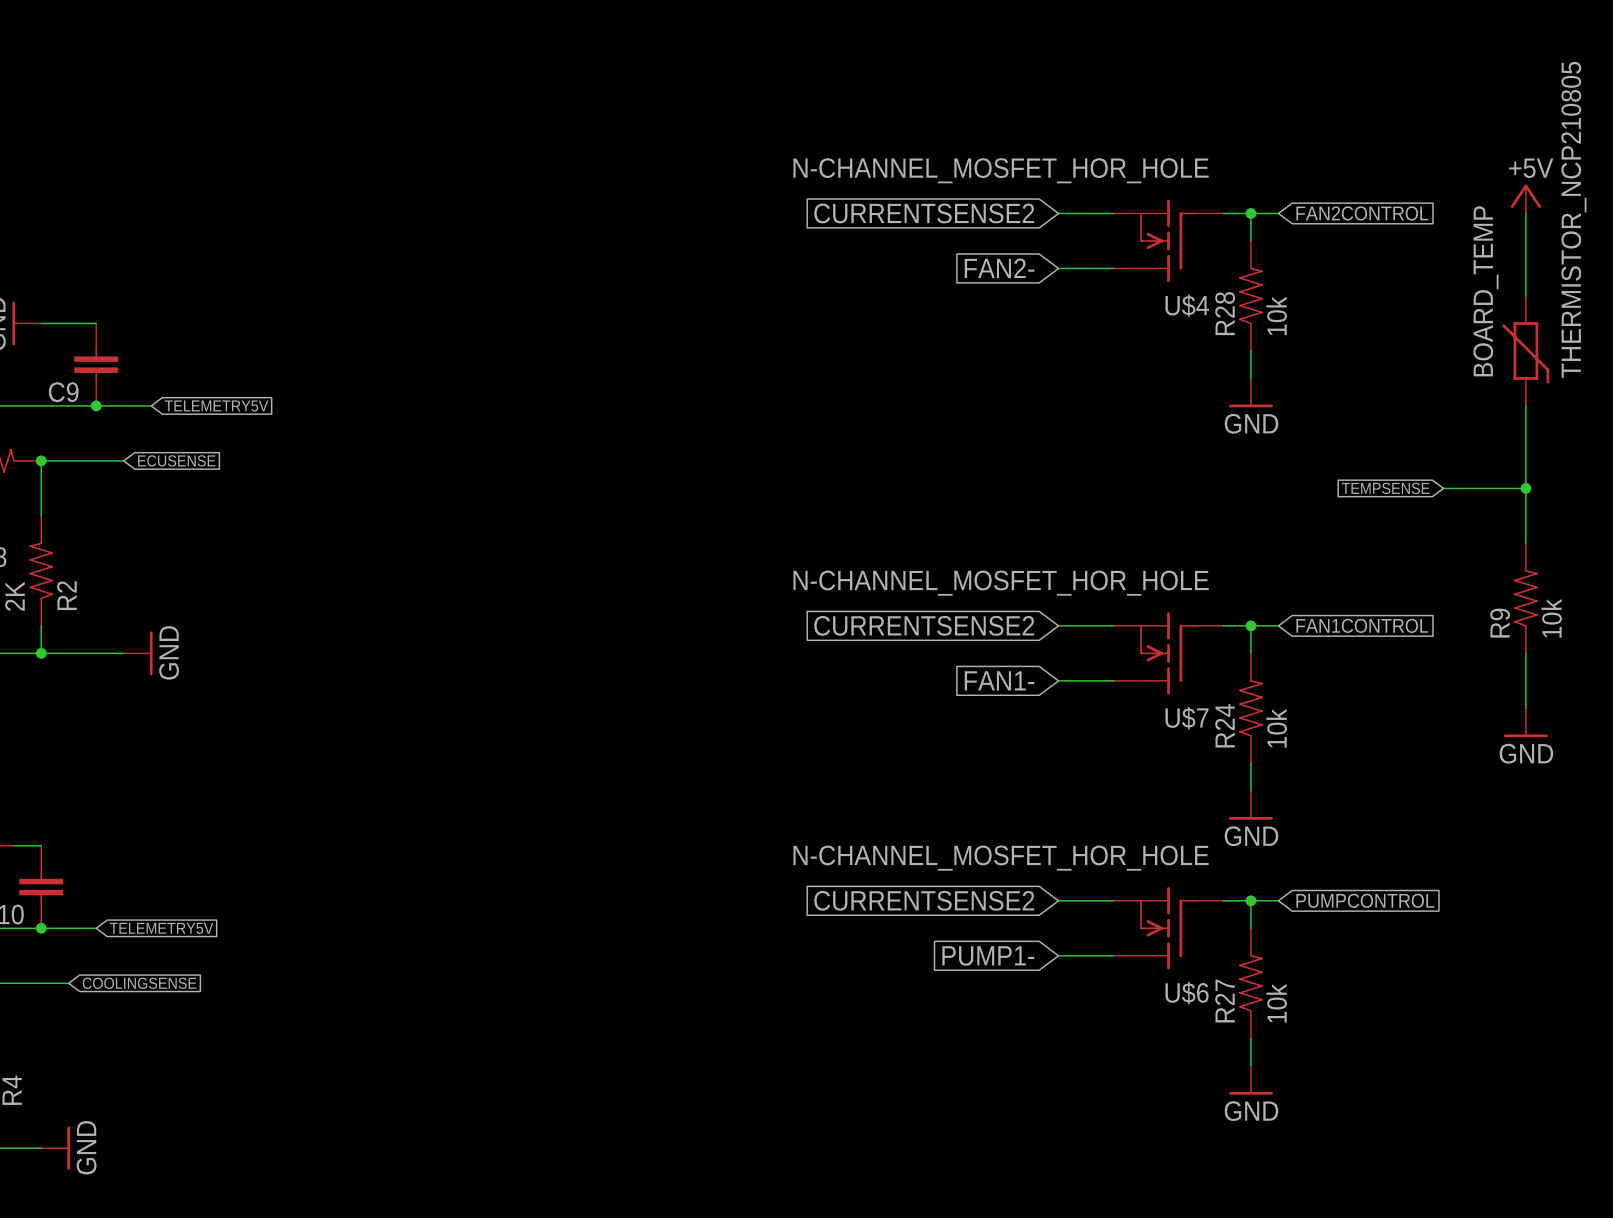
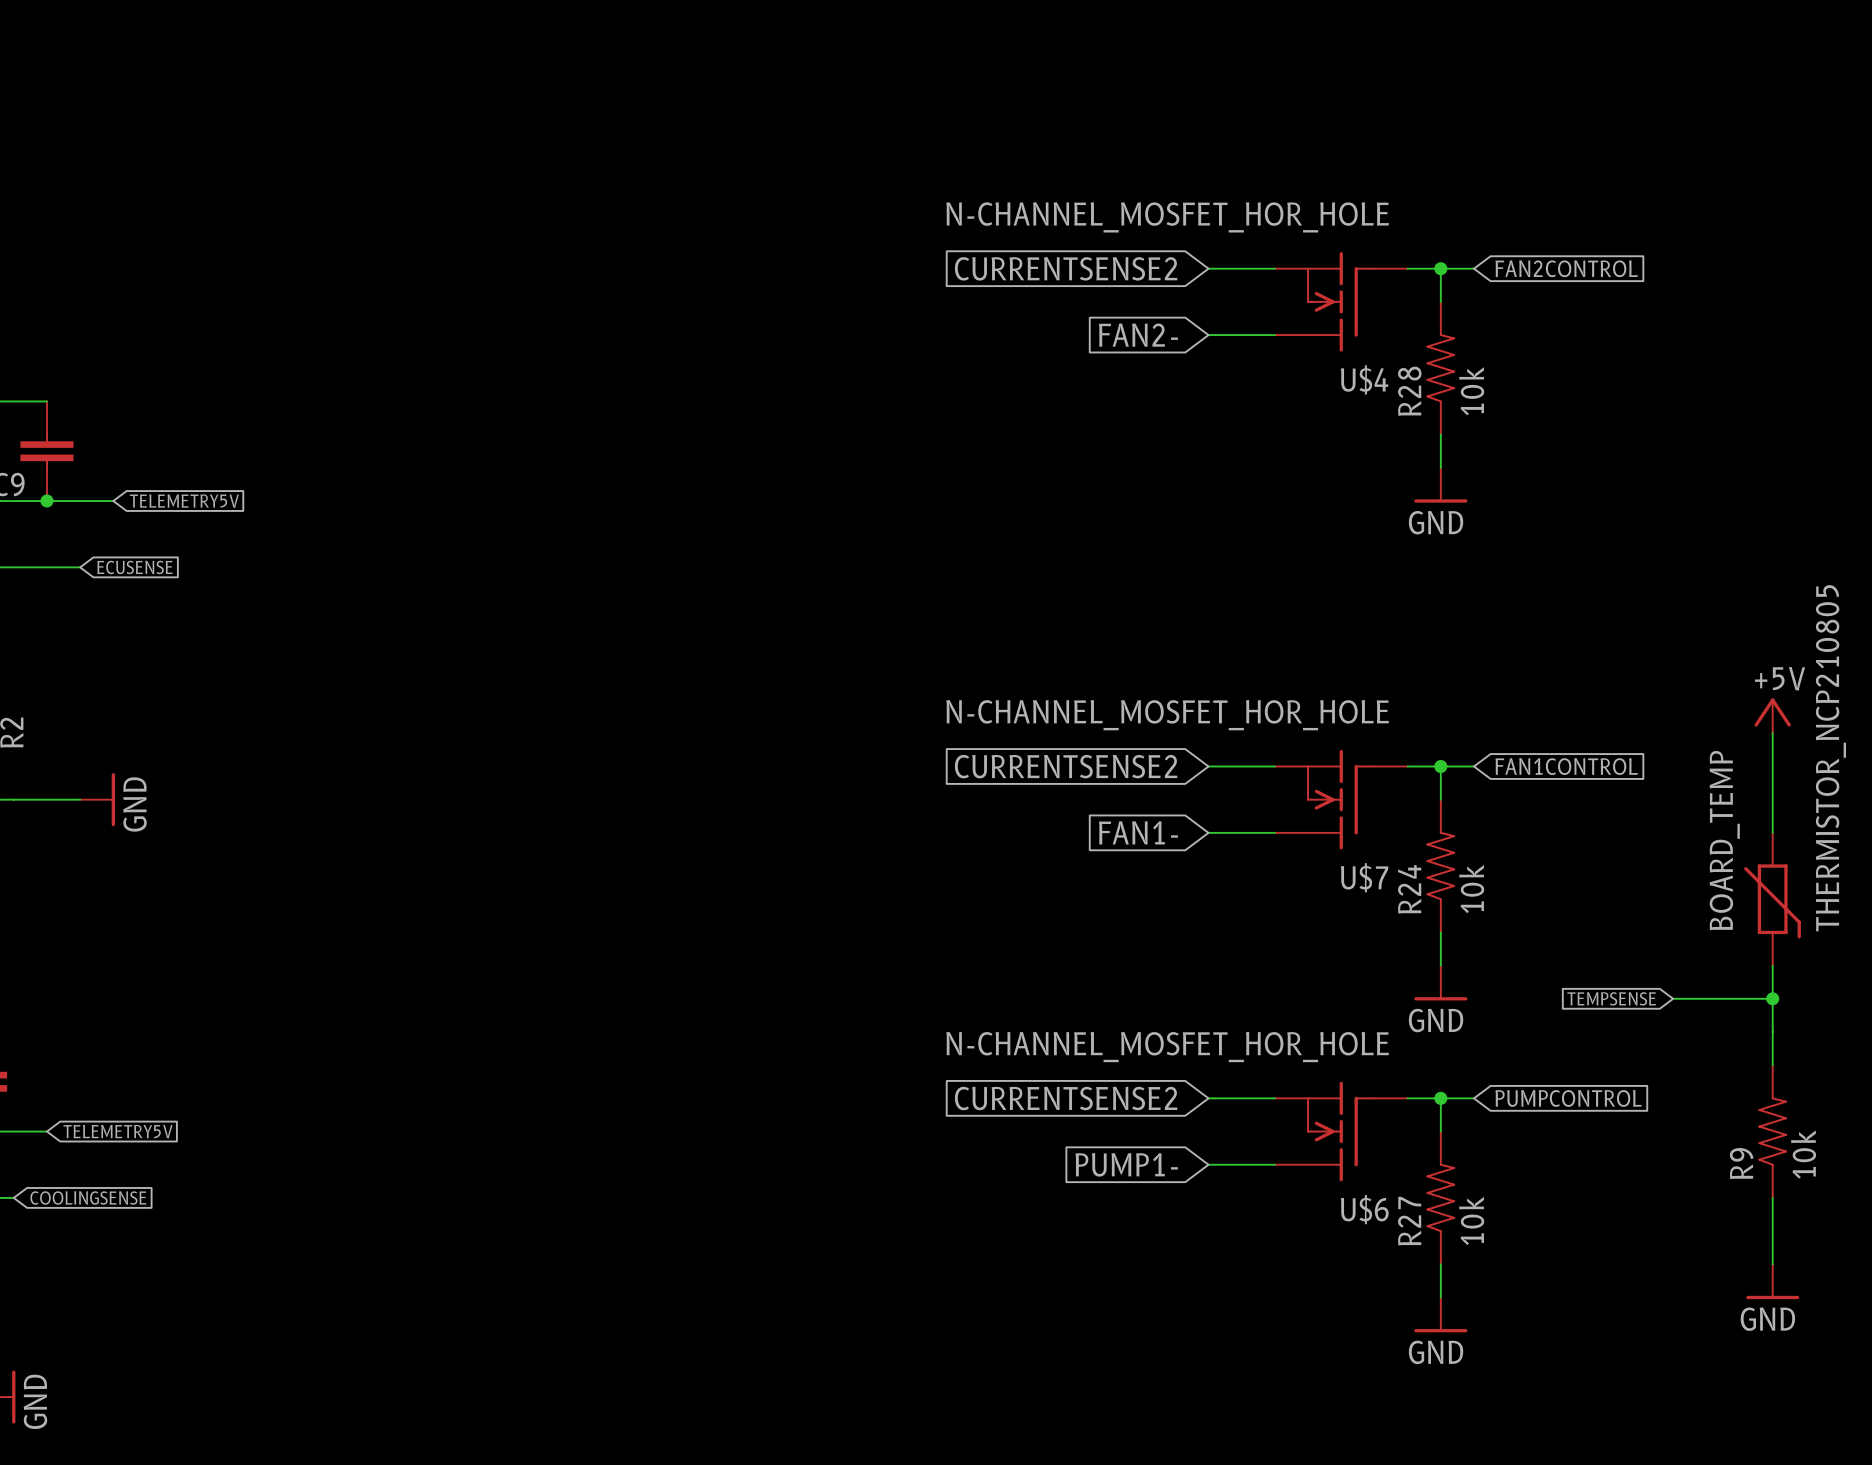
power symbol: +5V (1525, 199) -> none
wire: (1525, 213) (1525, 295) -> none
BOARD_TEMP: THERMISTOR_NCP210805 (1525, 350) -> none
wire: (1525, 405) (1525, 543) -> none
global label: TEMPSENSE (1385, 488) -> none
wire: (1443, 488) (1525, 488) -> none
junction: (1525, 488) -> none
power symbol: none -> +5V (1772, 715)
R9 position: (1525, 598) -> (1772, 1131)
power symbol: GND (1525, 722) -> none
BOARD_TEMP: none -> THERMISTOR_NCP210805 (1772, 899)
wire: none -> (1772, 965) (1772, 1065)
global label: none -> TEMPSENSE (1611, 998)
wire: none -> (1673, 998) (1772, 998)
junction: none -> (1772, 998)
wire: none -> (1772, 1197) (1772, 1264)
power symbol: none -> GND (1772, 1281)

